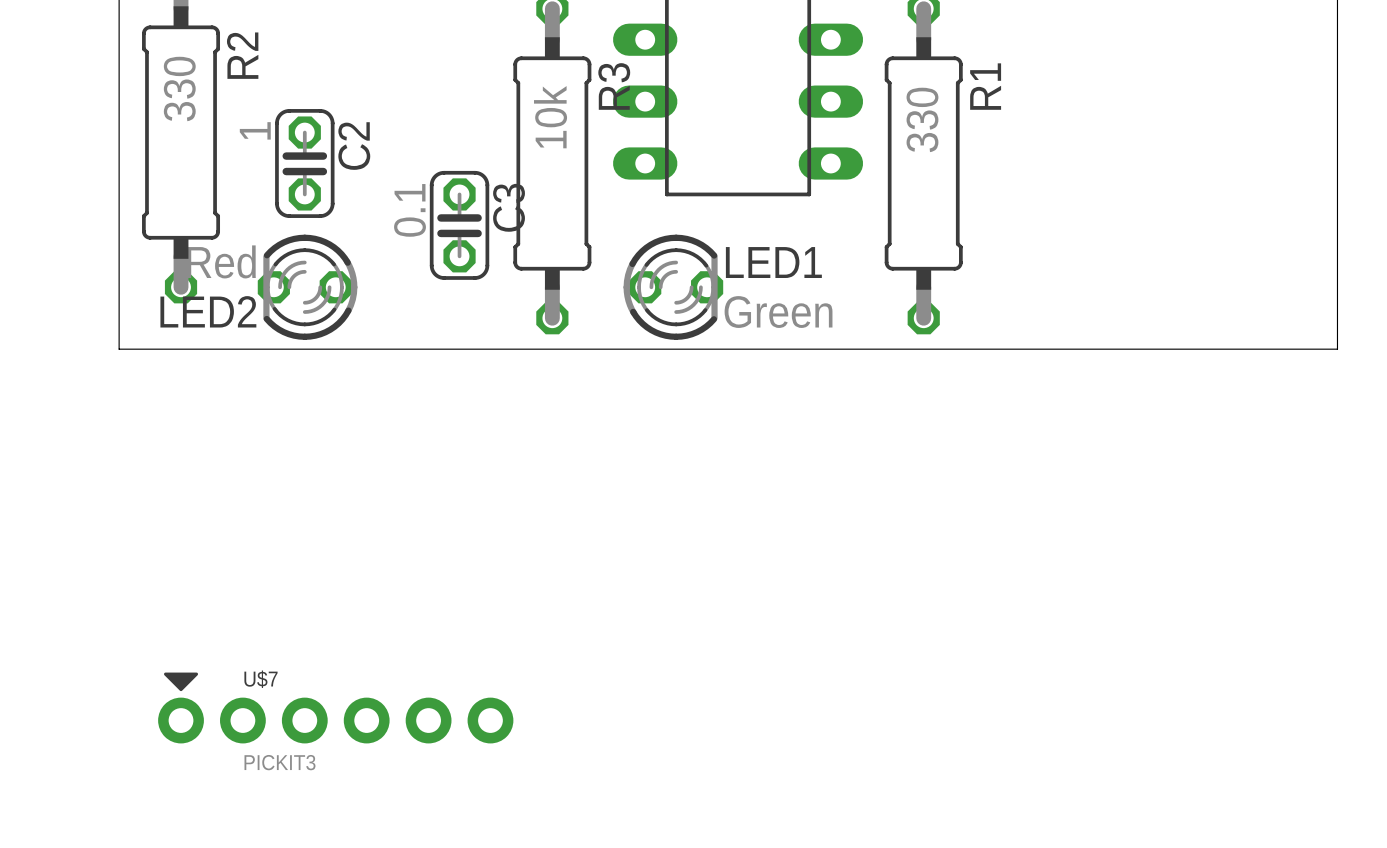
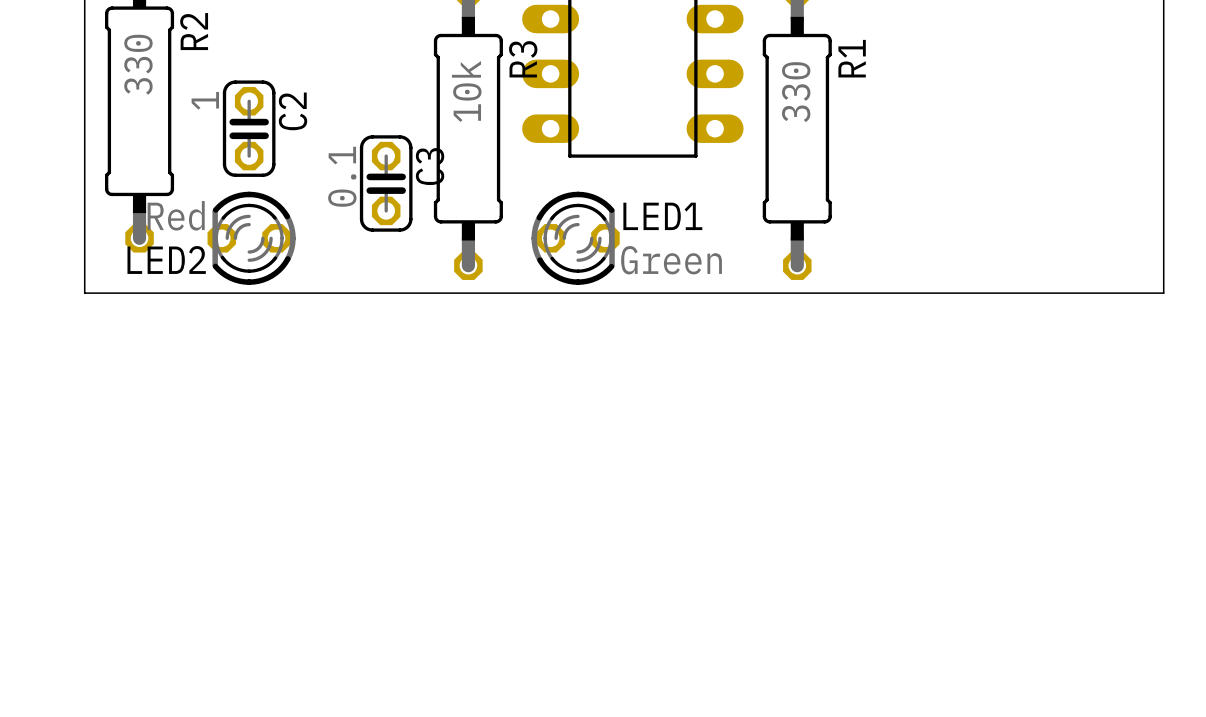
U$7: PICKIT3 (335, 707) -> none

